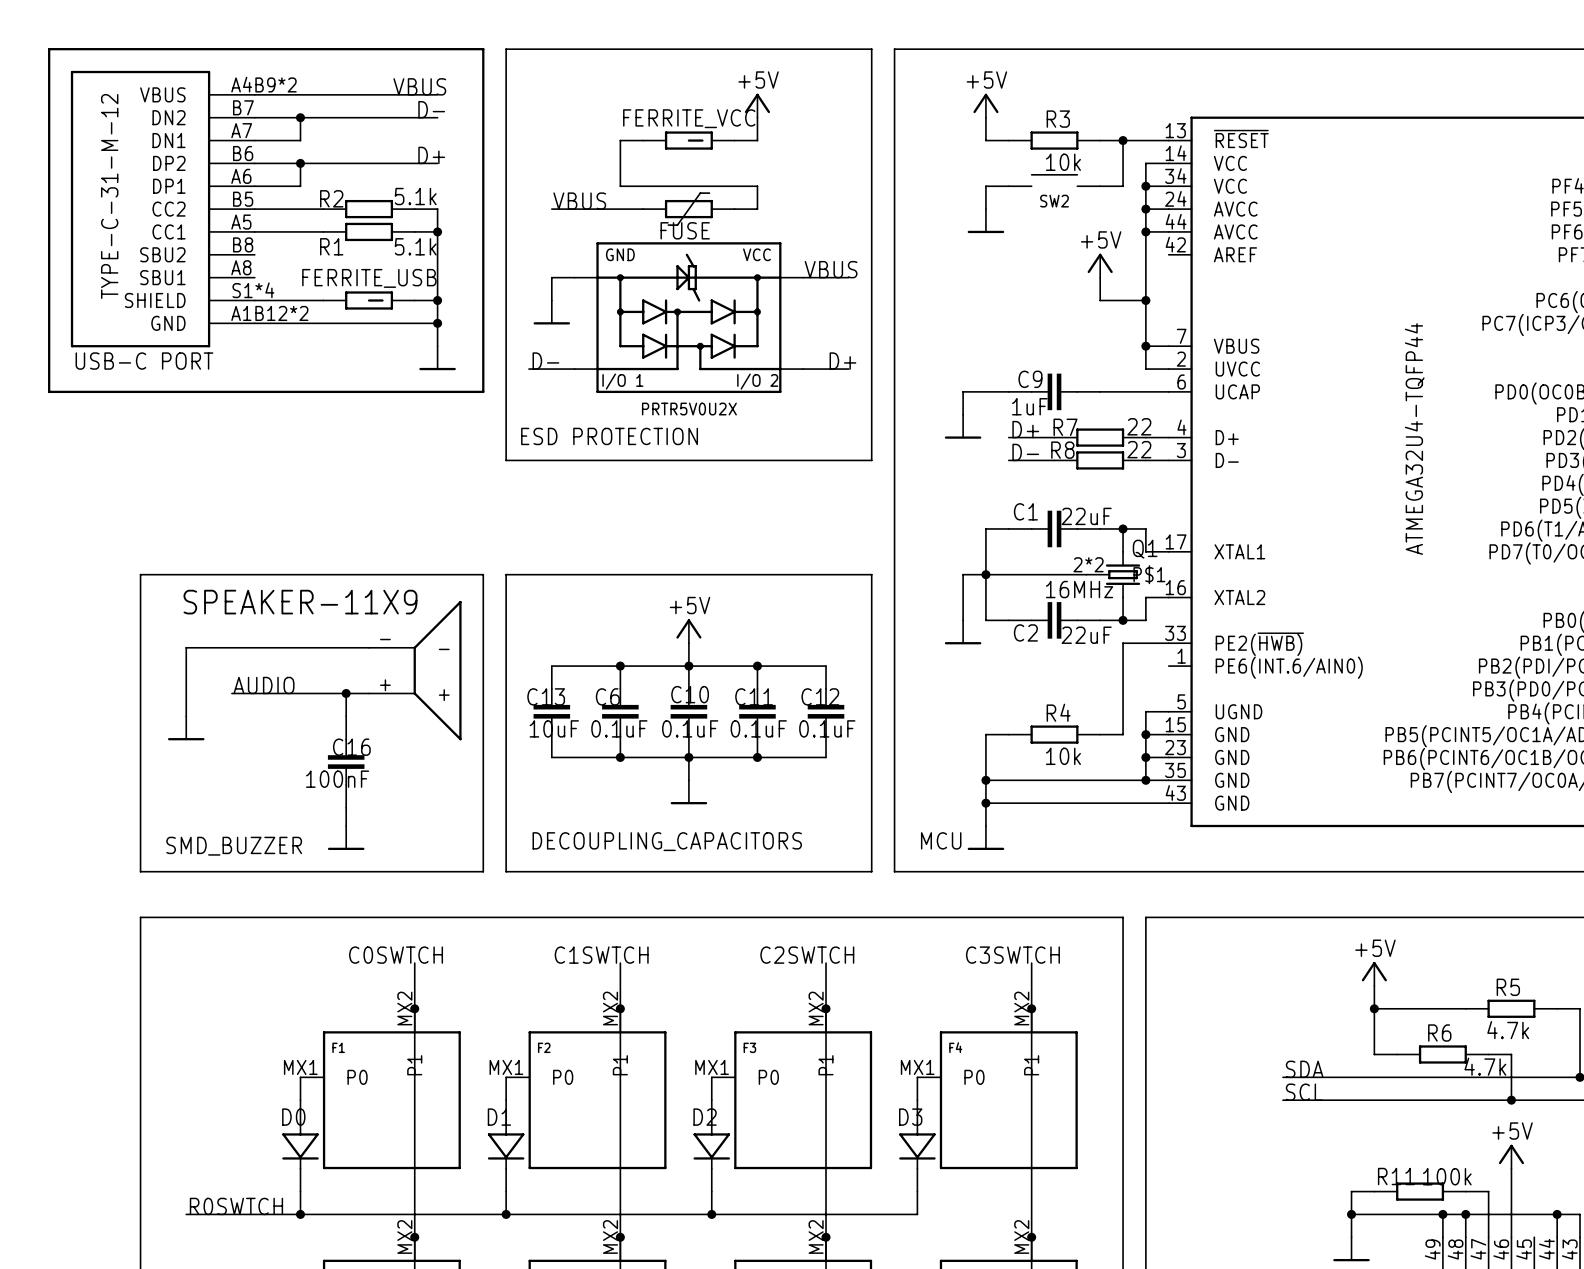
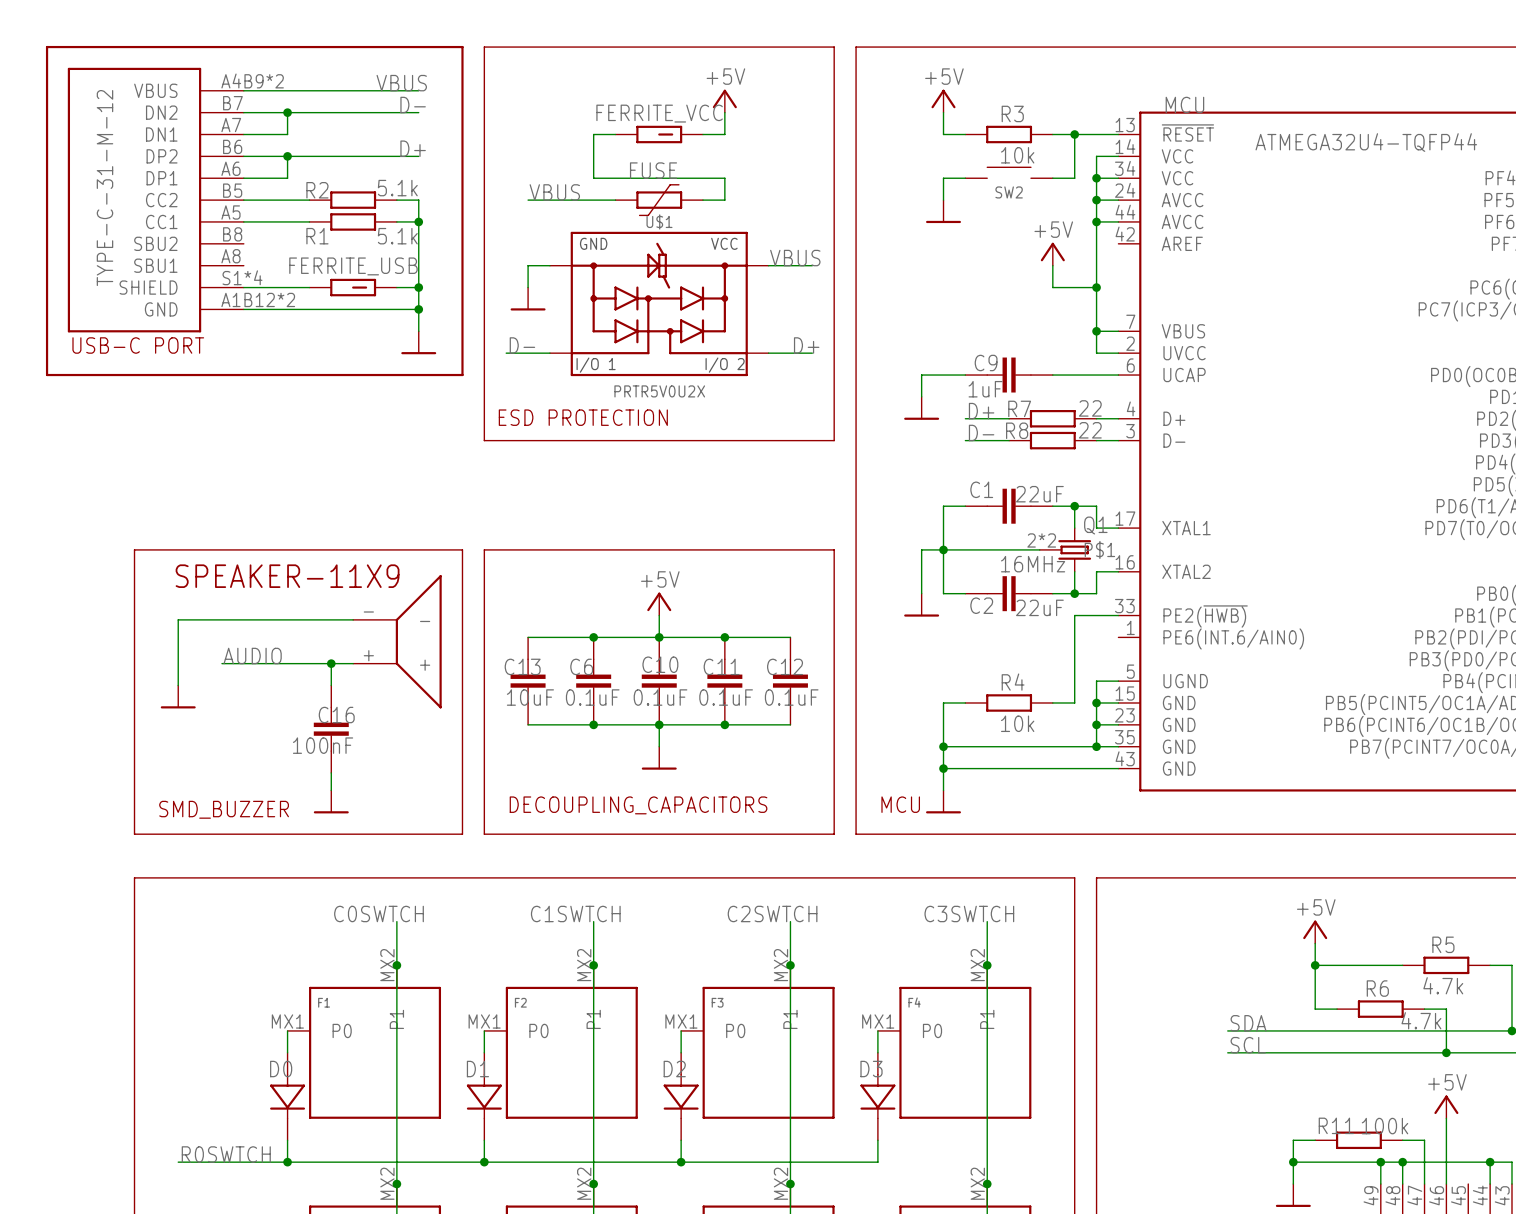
MCU name: none -> MCU (1184, 104)
FUSE name position: FUSE (685, 230) -> FUSE (653, 170)
U$1 name: none -> U$1 (659, 221)
MCU value rotation: 0° (1414, 439) -> 90° clockwise (1366, 142)
MCU value position: ATMEGA32U4-TQFP44 (1414, 439) -> ATMEGA32U4-TQFP44 (1366, 142)

